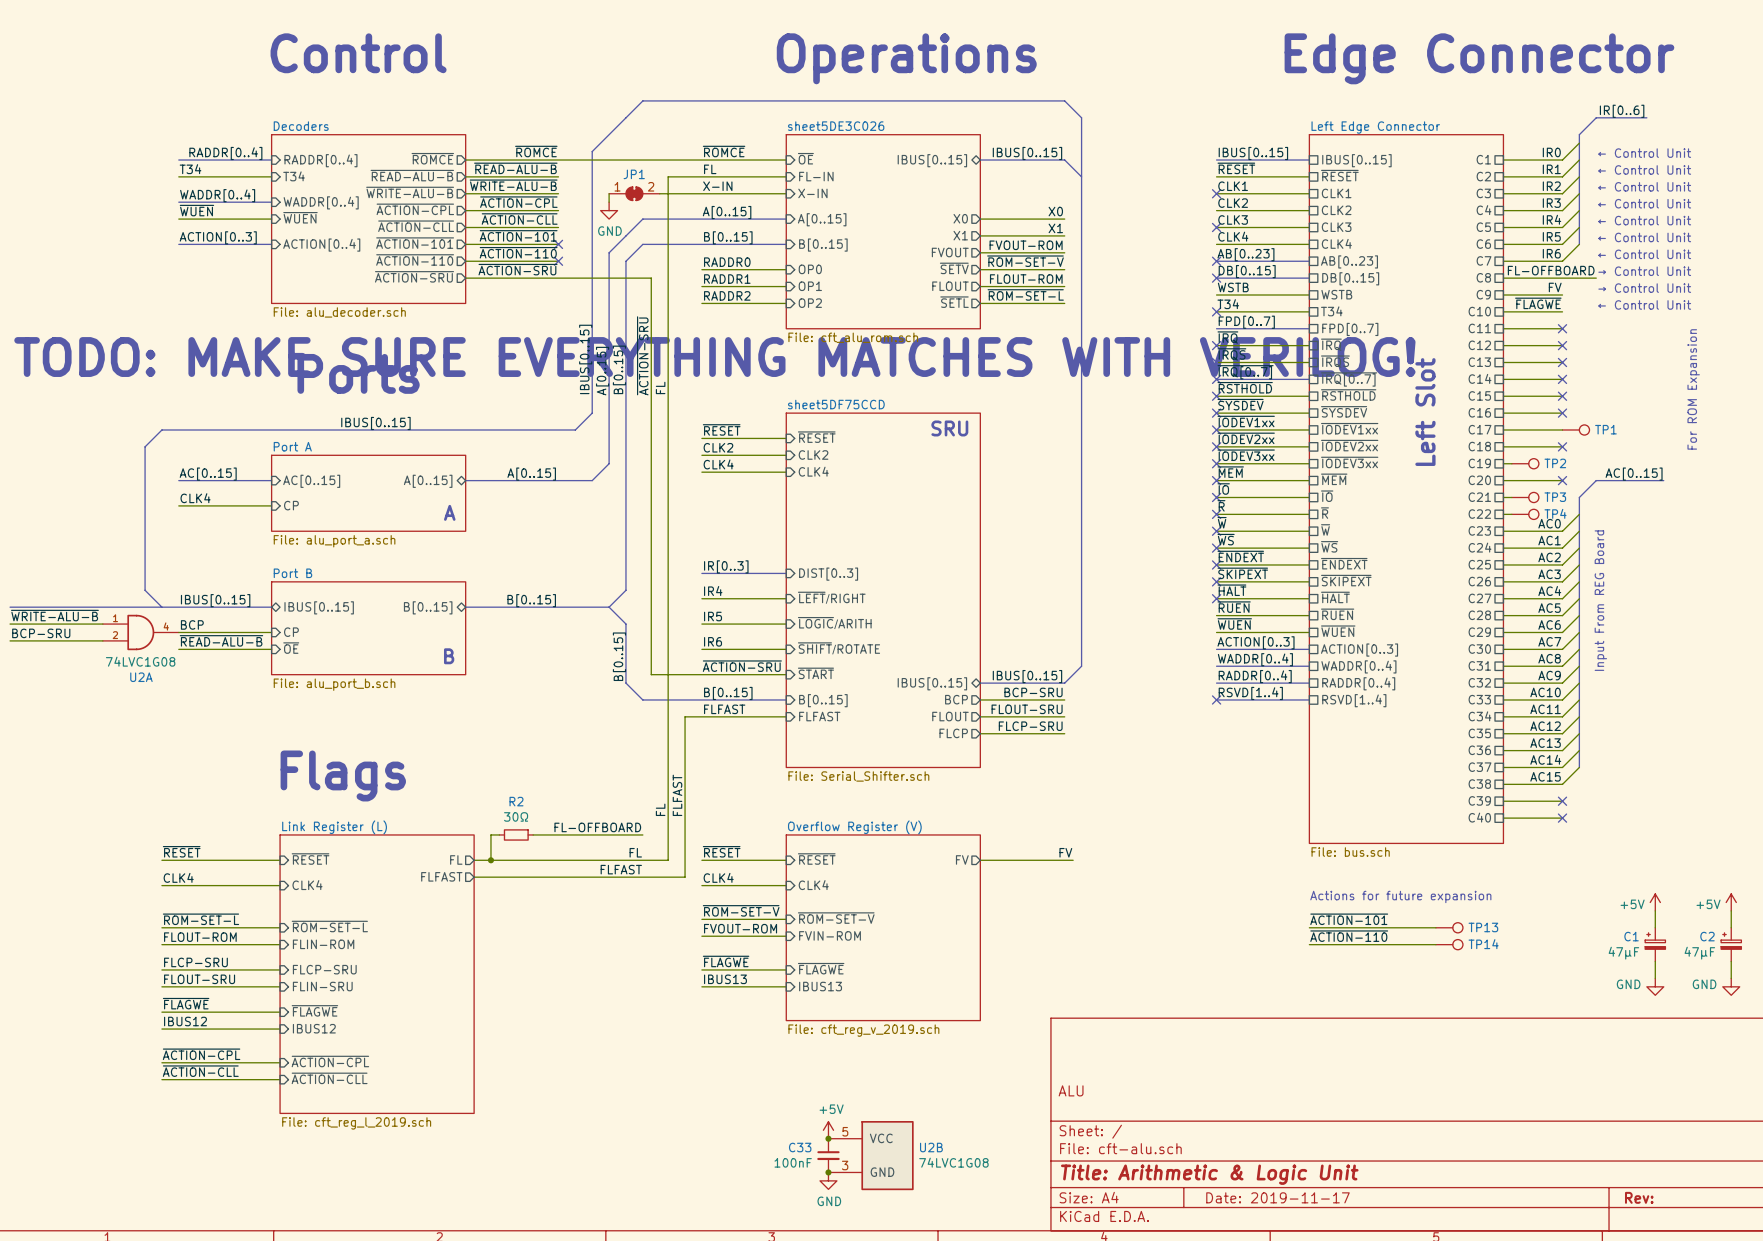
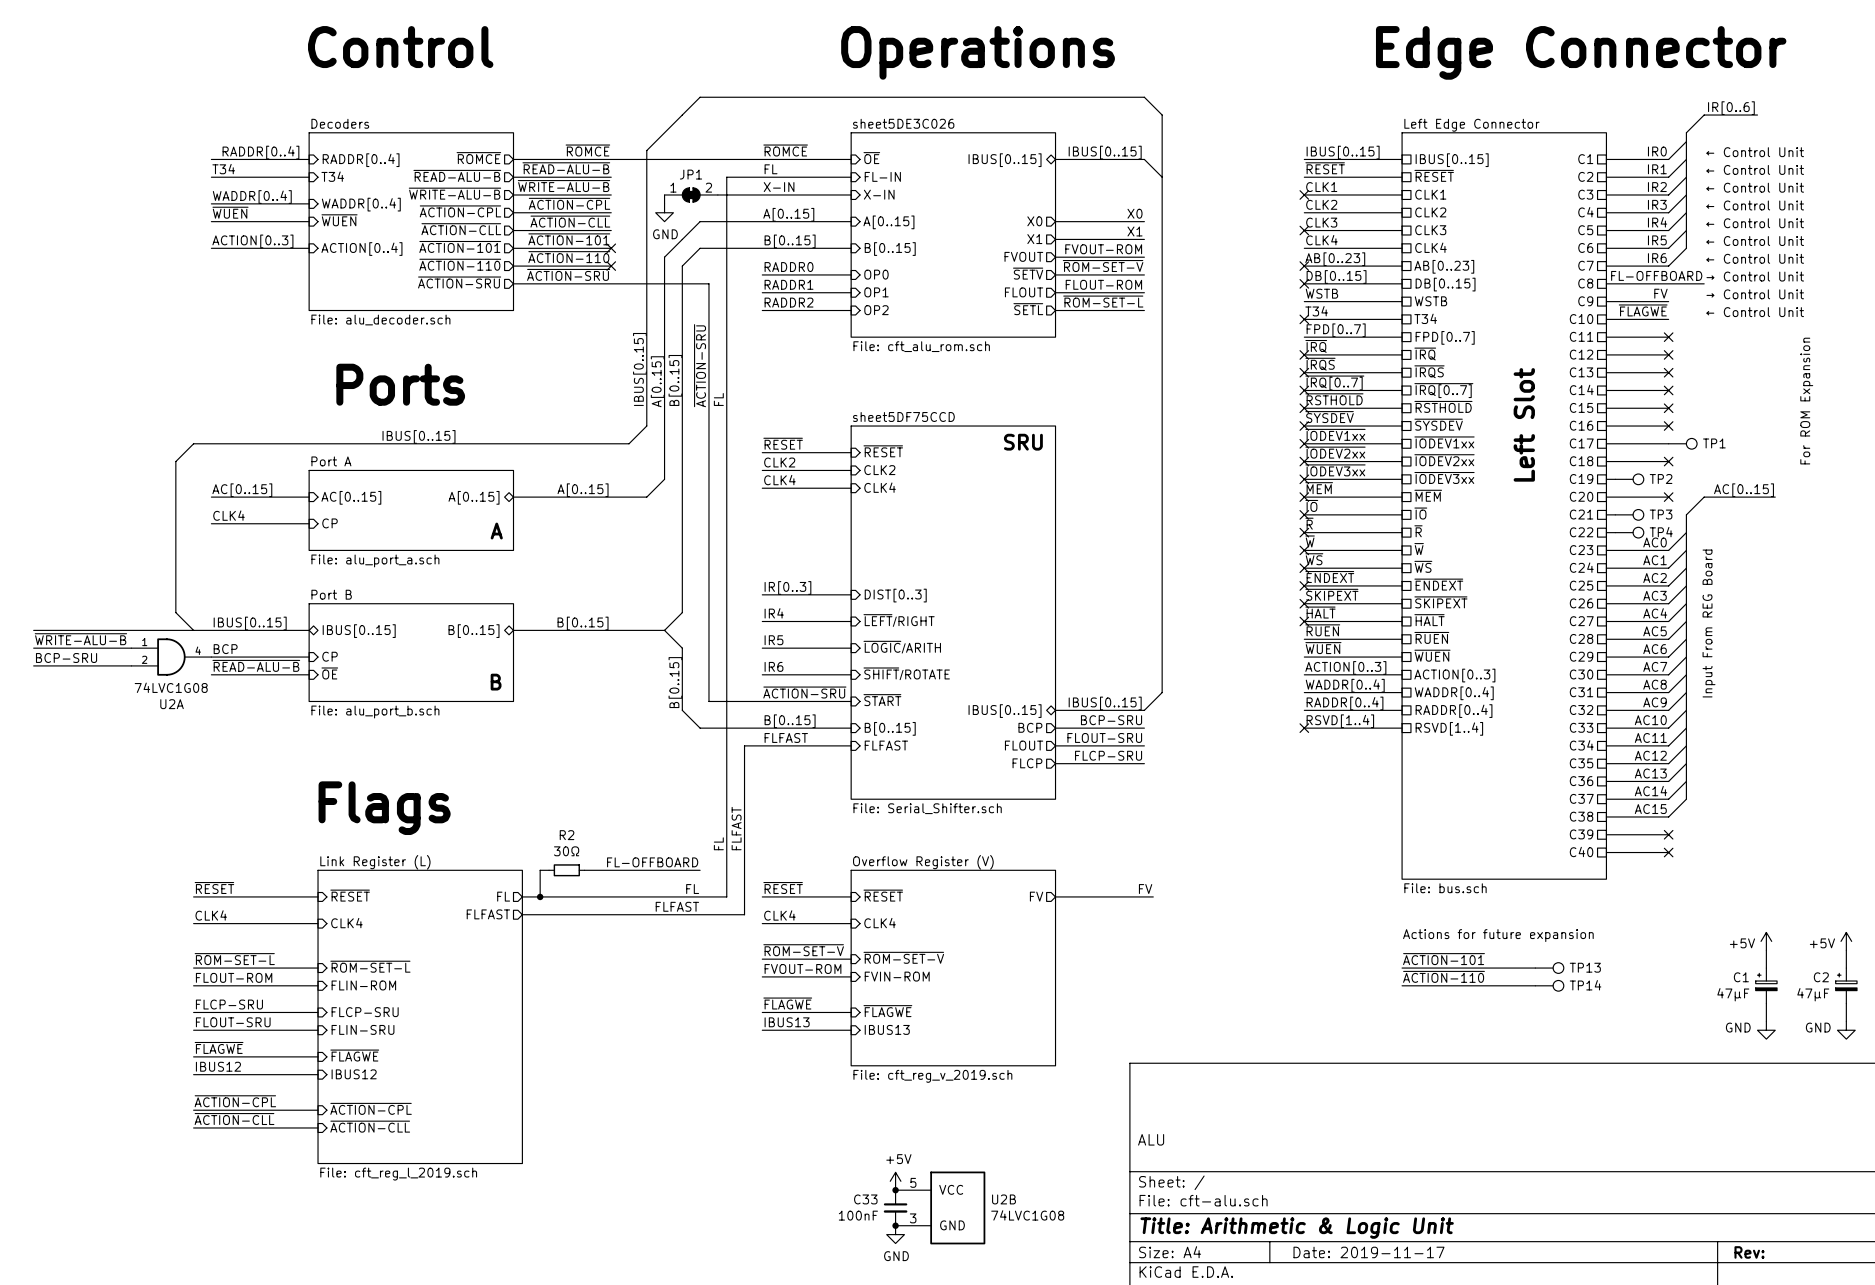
text: TODO: MAKE SURE EVERYTHING MATCHES WITH VERILOG! (714, 357) -> none

